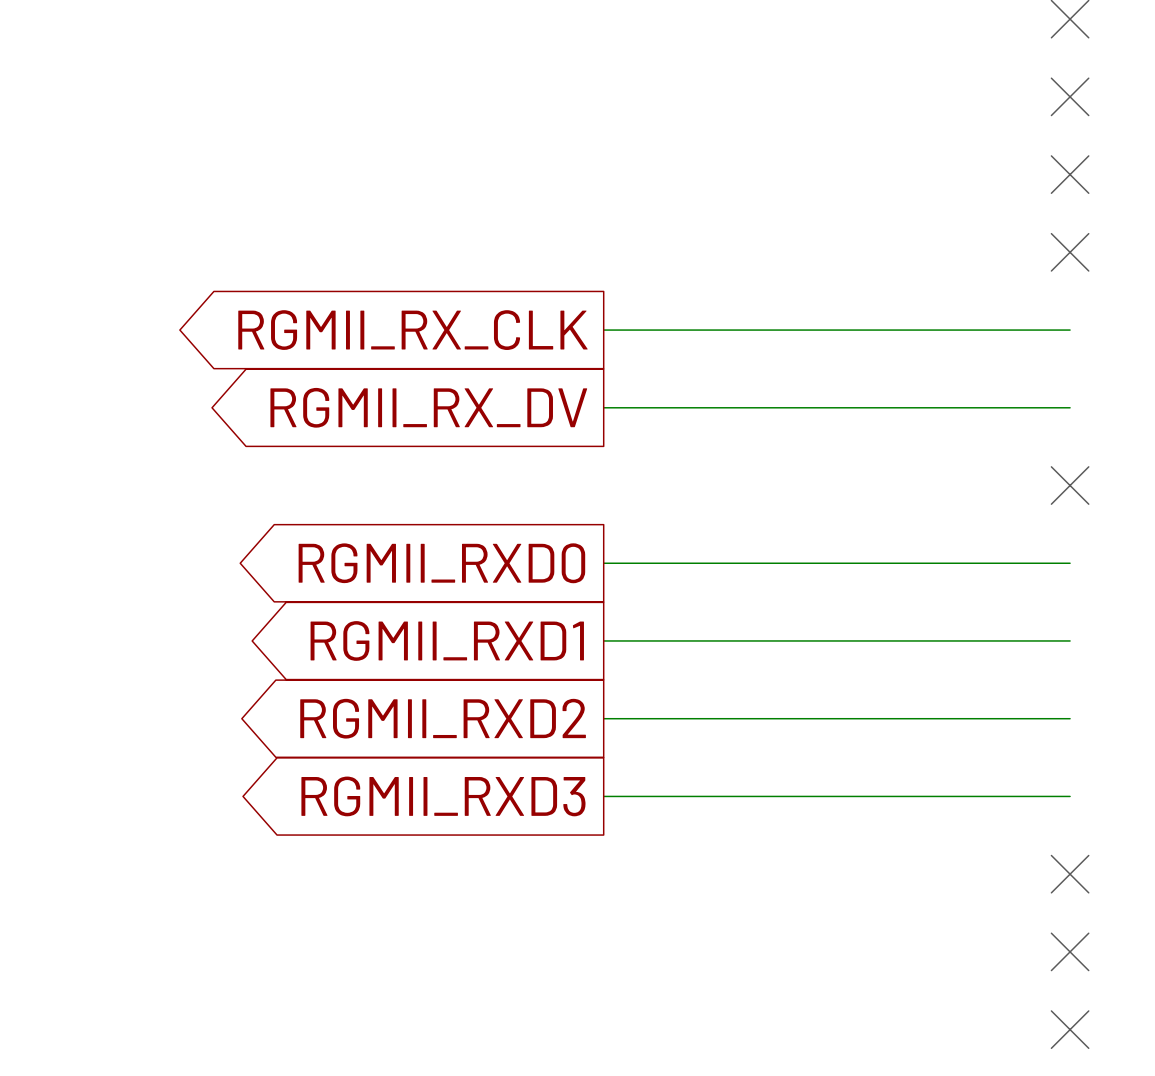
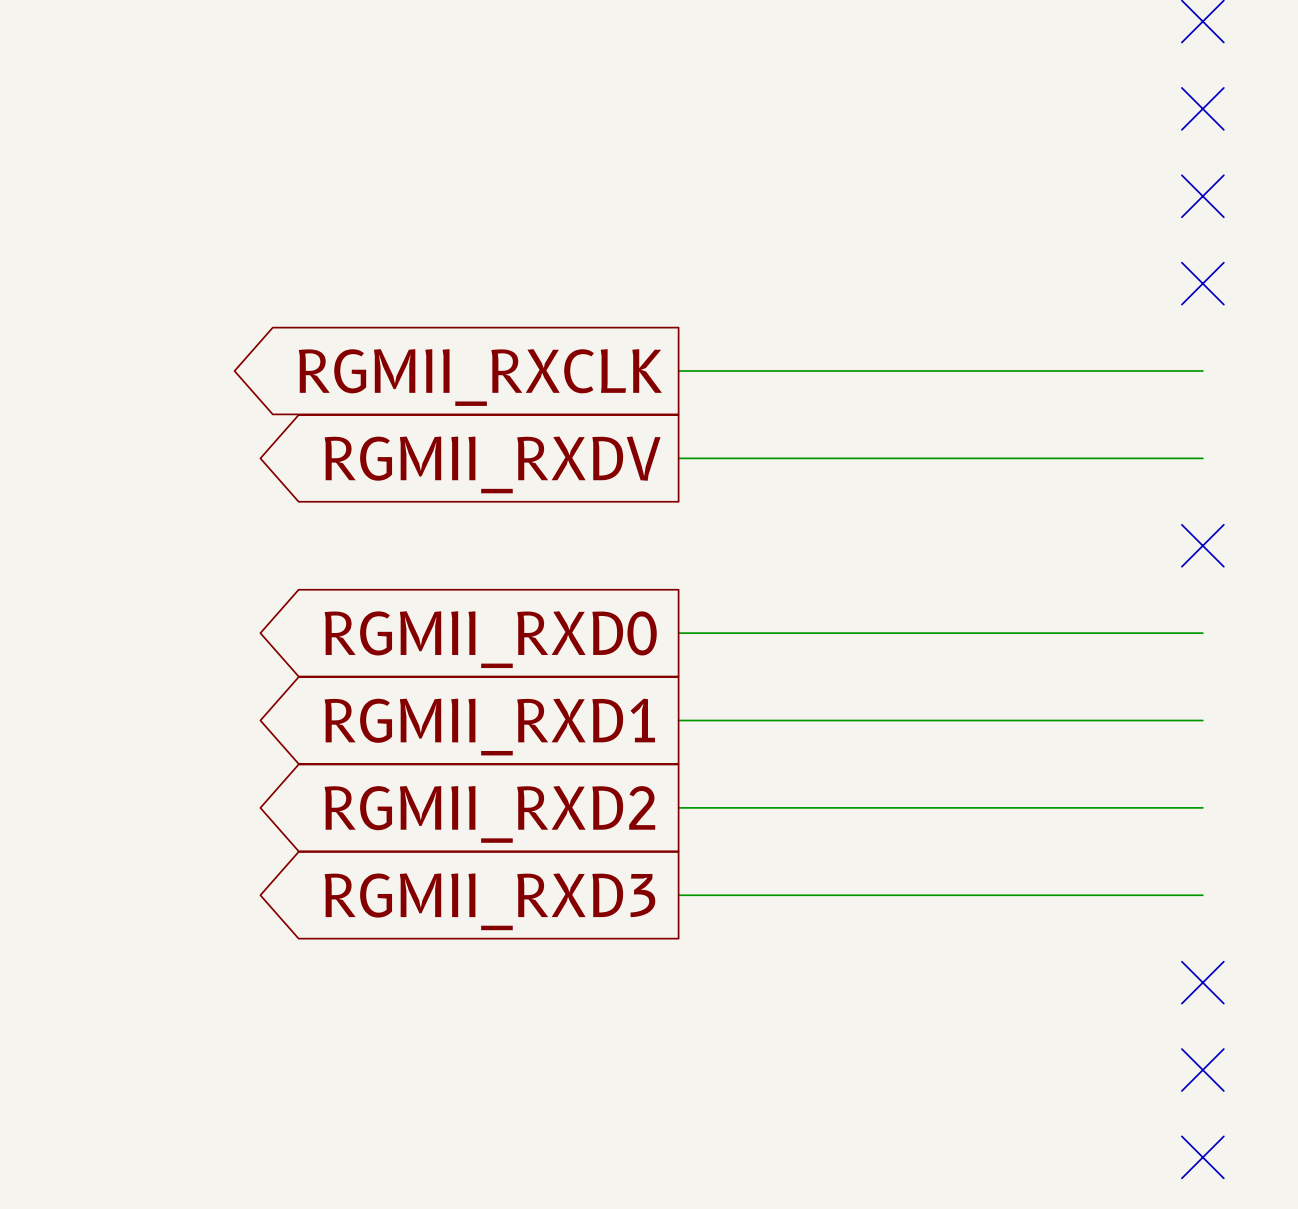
global label: RGMII_RX_CLK (412, 330) -> RGMII_RXCLK (480, 377)
global label: RGMII_RX_DV (428, 407) -> RGMII_RXDV (492, 464)

